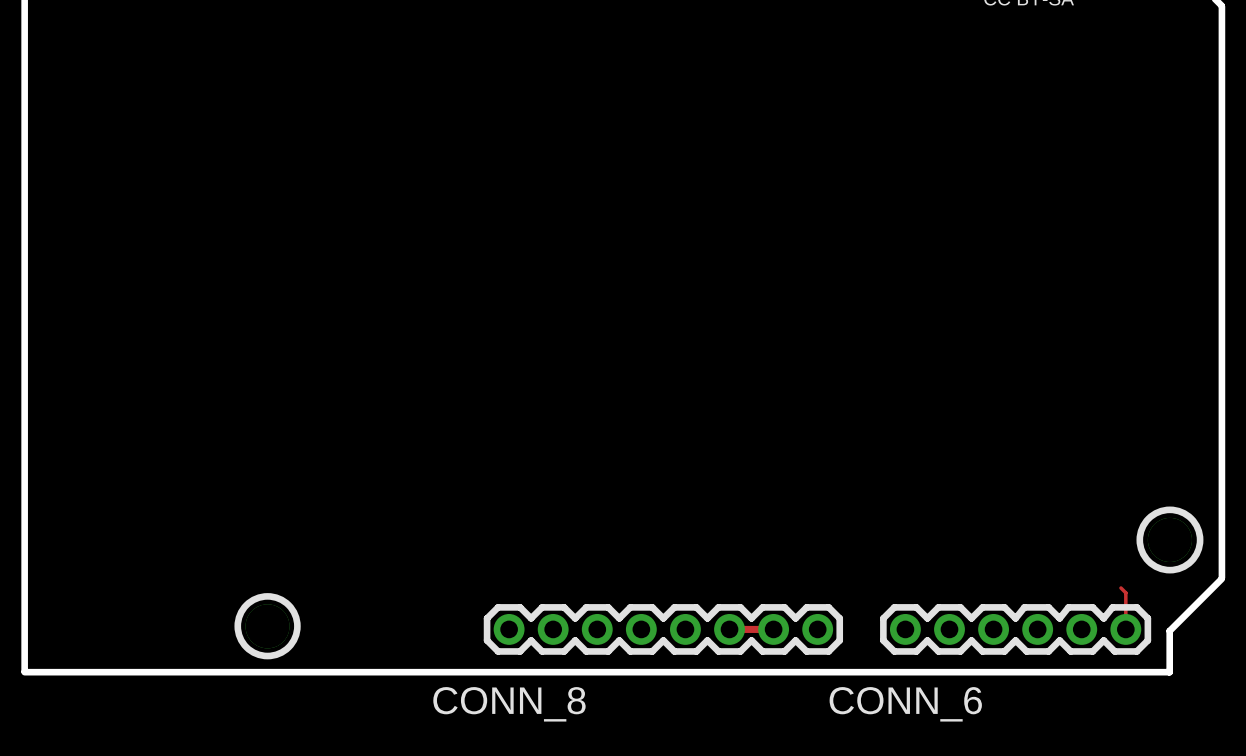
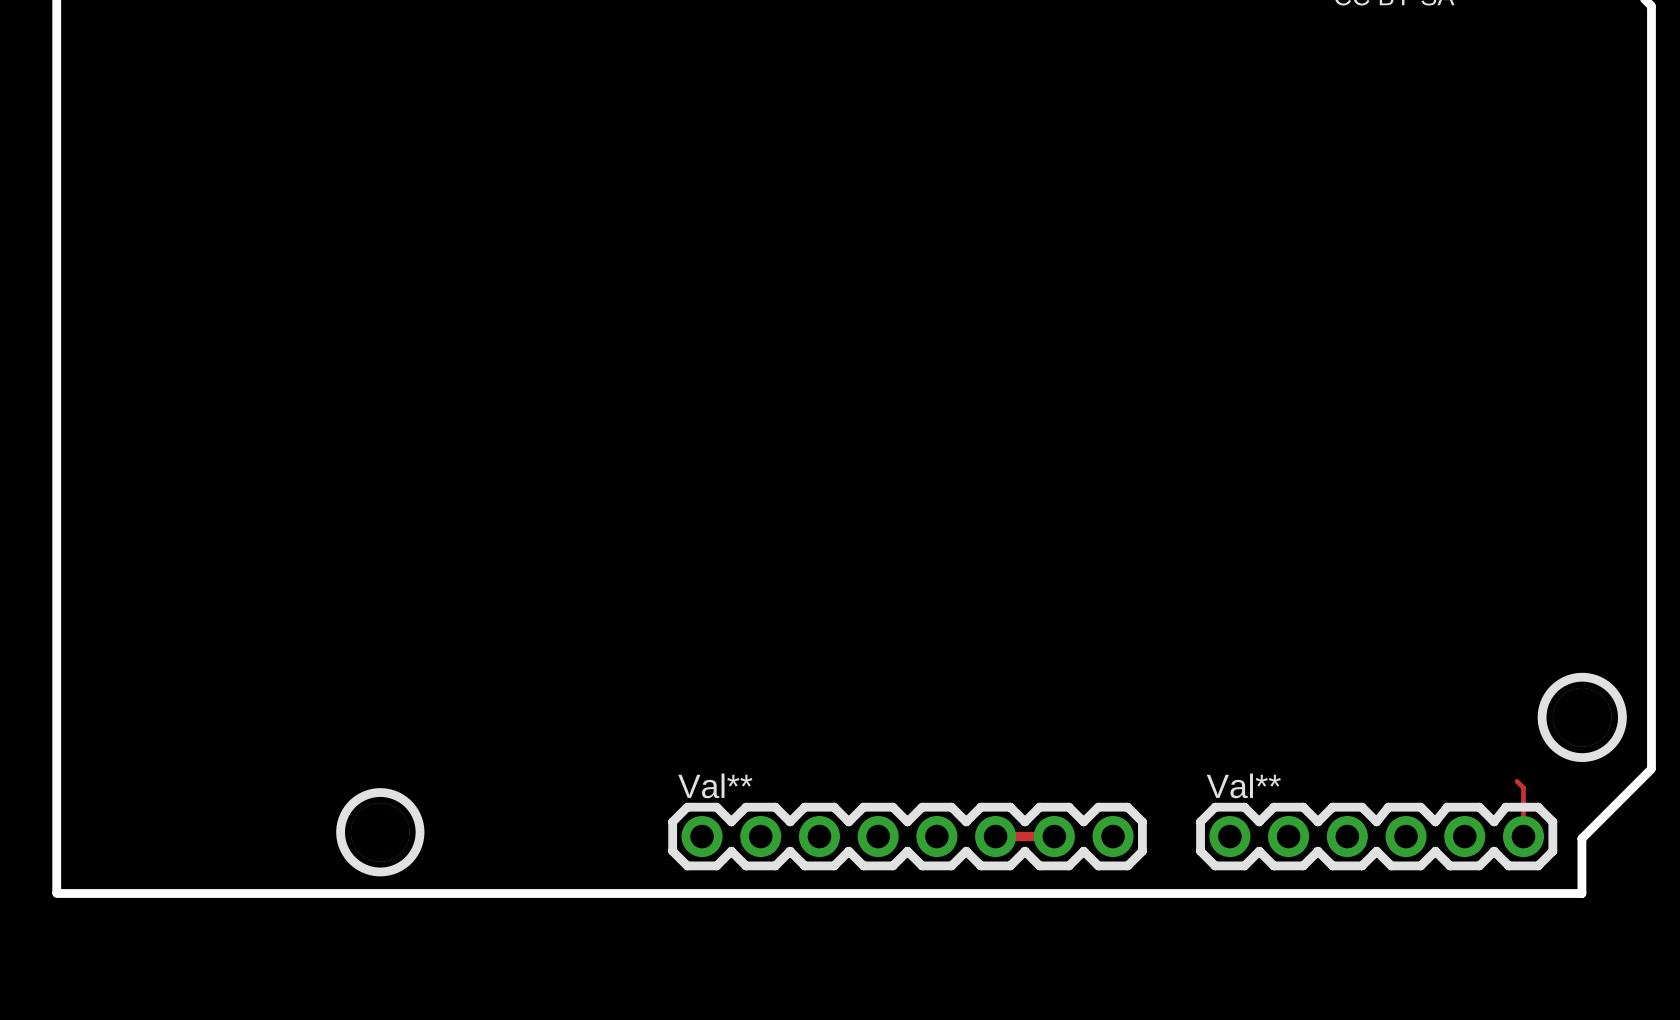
part value: CONN_8 (509, 704) -> Val** (715, 785)
part value: CONN_6 (905, 704) -> Val** (1243, 785)

